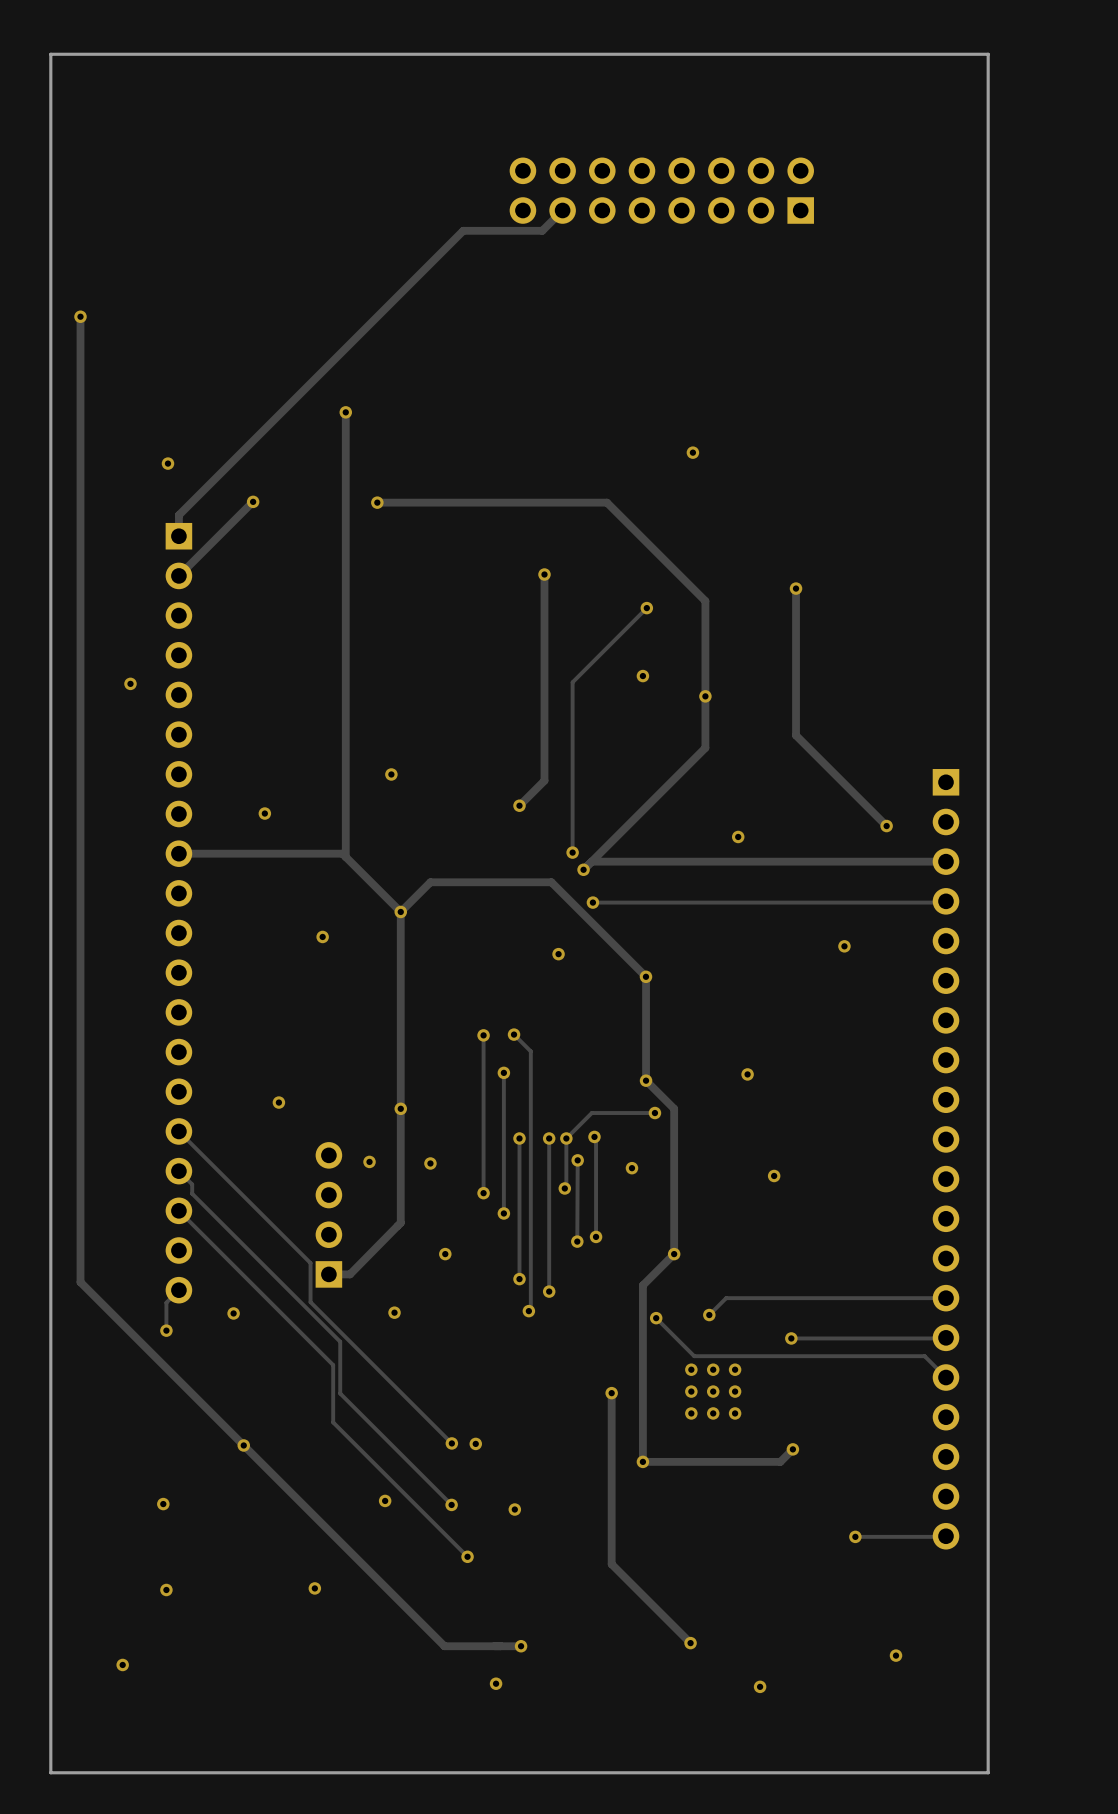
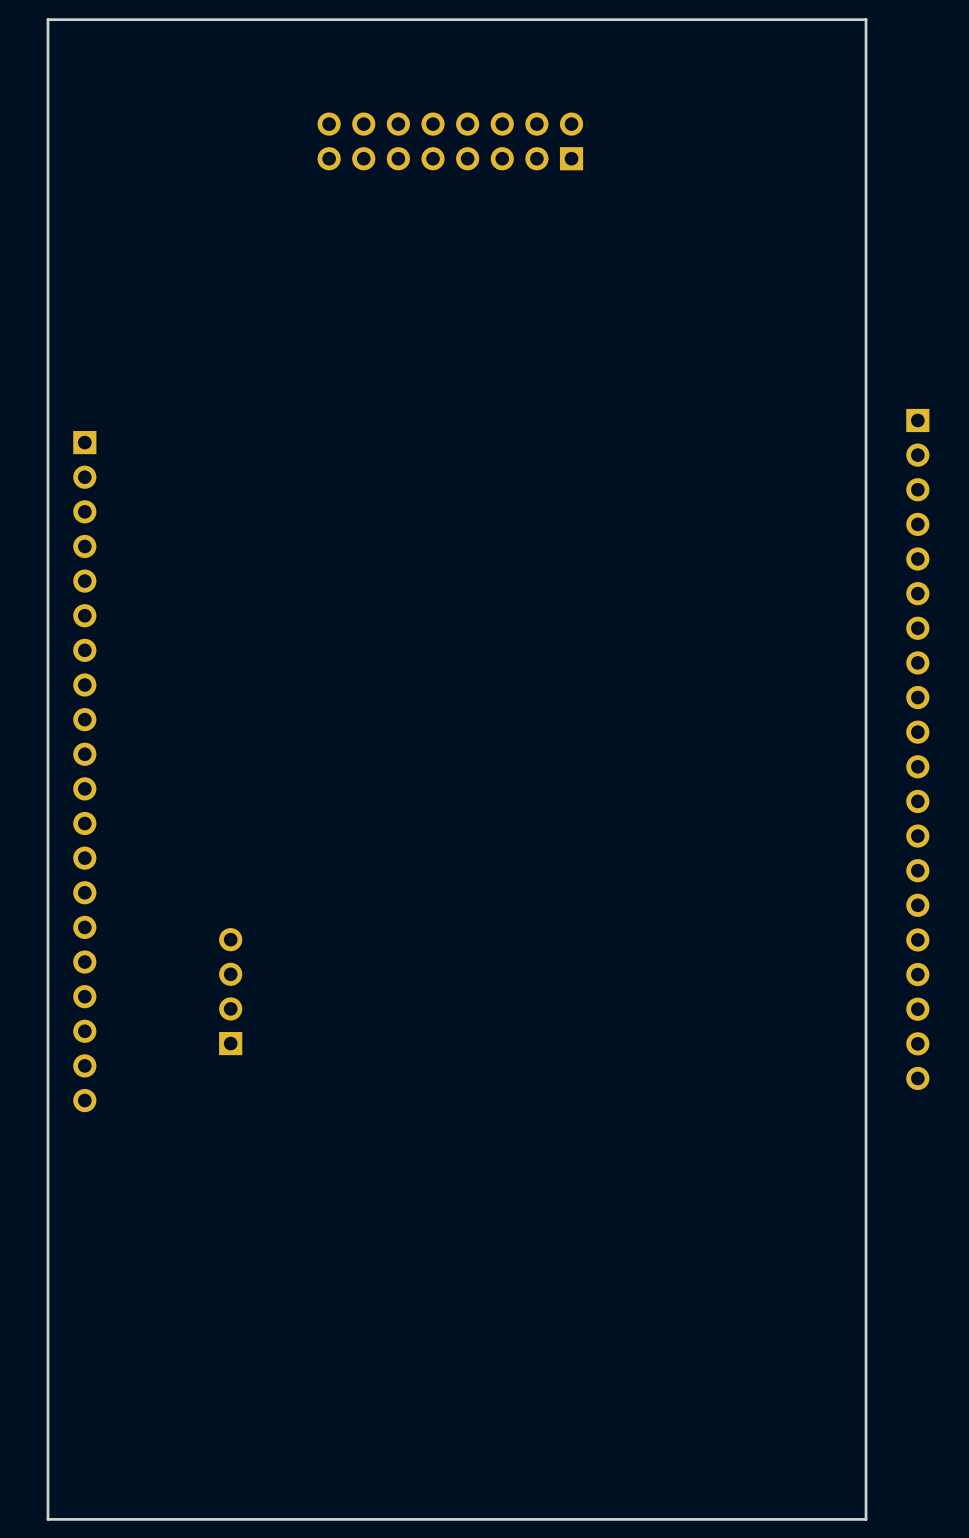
part position: (661, 190) -> (450, 141)
track: (562, 210) (542, 230) (463, 230) (178, 515) (178, 536) -> none
track: (80, 316) (80, 1282) (444, 1646) (521, 1646) -> none
via: (80, 316) -> none
track: (345, 412) (345, 856) -> none
via: (345, 412) -> none
via: (692, 452) -> none
via: (167, 463) -> none
track: (252, 501) (178, 575) -> none
via: (253, 501) -> none
track: (377, 502) (606, 502) (705, 601) (705, 747) (583, 869) -> none
via: (377, 502) -> none
track: (544, 574) (544, 780) (519, 805) -> none
via: (544, 574) -> none
track: (796, 588) (796, 735) (886, 826) -> none
via: (796, 588) -> none
track: (646, 608) (572, 682) (572, 852) -> none
via: (646, 608) -> none
via: (642, 676) -> none
via: (130, 683) -> none
via: (705, 696) -> none
via: (391, 774) -> none
via: (519, 805) -> none
via: (264, 813) -> none
via: (886, 826) -> none
via: (738, 836) -> none
via: (572, 852) -> none
track: (178, 853) (342, 853) (400, 911) -> none
track: (946, 861) (591, 861) -> none
via: (583, 869) -> none
track: (946, 901) (592, 902) -> none
via: (592, 902) -> none
track: (400, 911) (430, 882) (551, 882) (646, 976) (646, 1080) (674, 1108) (674, 1254) (642, 1285) (642, 1461) (780, 1461) (792, 1449) -> none
track: (400, 911) (400, 1222) (349, 1274) (328, 1274) -> none
via: (400, 911) -> none
part position: (178, 913) -> (84, 771)
via: (322, 936) -> none
via: (844, 946) -> none
via: (558, 954) -> none
via: (645, 976) -> none
track: (514, 1034) (530, 1051) (530, 1309) (528, 1311) -> none
via: (514, 1034) -> none
track: (483, 1035) (483, 1193) -> none
via: (483, 1035) -> none
track: (503, 1072) (503, 1213) -> none
via: (503, 1072) -> none
via: (747, 1074) -> none
via: (646, 1080) -> none
via: (278, 1102) -> none
via: (400, 1108) -> none
track: (654, 1113) (591, 1113) (564, 1140) -> none
via: (654, 1113) -> none
track: (178, 1131) (310, 1263) (310, 1302) (451, 1443) -> none
track: (594, 1136) (596, 1138) (596, 1236) -> none
via: (594, 1136) -> none
track: (519, 1138) (519, 1279) -> none
via: (519, 1138) -> none
track: (549, 1138) (549, 1291) -> none
via: (549, 1138) -> none
track: (566, 1138) (566, 1186) (564, 1188) -> none
via: (566, 1138) -> none
part position: (946, 1159) -> (917, 749)
via: (577, 1160) -> none
via: (369, 1161) -> none
via: (430, 1163) -> none
track: (580, 1163) (577, 1160) (577, 1241) -> none
via: (631, 1168) -> none
track: (178, 1171) (192, 1184) (192, 1193) (340, 1341) (340, 1393) (451, 1504) -> none
via: (774, 1175) -> none
via: (564, 1188) -> none
via: (483, 1193) -> none
track: (178, 1210) (333, 1365) (333, 1422) (467, 1556) -> none
via: (503, 1213) -> none
part position: (328, 1214) -> (230, 991)
via: (596, 1236) -> none
via: (577, 1241) -> none
via: (445, 1254) -> none
via: (674, 1254) -> none
via: (519, 1279) -> none
track: (178, 1290) (166, 1302) (166, 1330) -> none
via: (549, 1291) -> none
track: (946, 1298) (726, 1298) (709, 1315) -> none
via: (528, 1311) -> none
via: (394, 1312) -> none
via: (233, 1313) -> none
via: (709, 1315) -> none
track: (656, 1318) (694, 1356) (924, 1356) (946, 1377) -> none
via: (656, 1318) -> none
via: (166, 1330) -> none
track: (946, 1337) (791, 1338) -> none
via: (791, 1338) -> none
via: (691, 1369) -> none
via: (713, 1369) -> none
via: (735, 1369) -> none
via: (691, 1391) -> none
via: (713, 1391) -> none
via: (735, 1391) -> none
track: (611, 1393) (611, 1564) (690, 1643) -> none
via: (611, 1393) -> none
via: (691, 1413) -> none
via: (713, 1413) -> none
via: (735, 1413) -> none
via: (451, 1443) -> none
via: (475, 1443) -> none
via: (243, 1445) -> none
via: (792, 1449) -> none
via: (642, 1461) -> none
via: (385, 1500) -> none
via: (163, 1504) -> none
via: (451, 1504) -> none
via: (514, 1509) -> none
via: (855, 1536) -> none
track: (946, 1536) (855, 1536) -> none
via: (467, 1556) -> none
via: (314, 1588) -> none
via: (166, 1589) -> none
via: (690, 1643) -> none
via: (521, 1646) -> none
via: (896, 1655) -> none
via: (122, 1664) -> none
via: (496, 1683) -> none
via: (760, 1686) -> none

